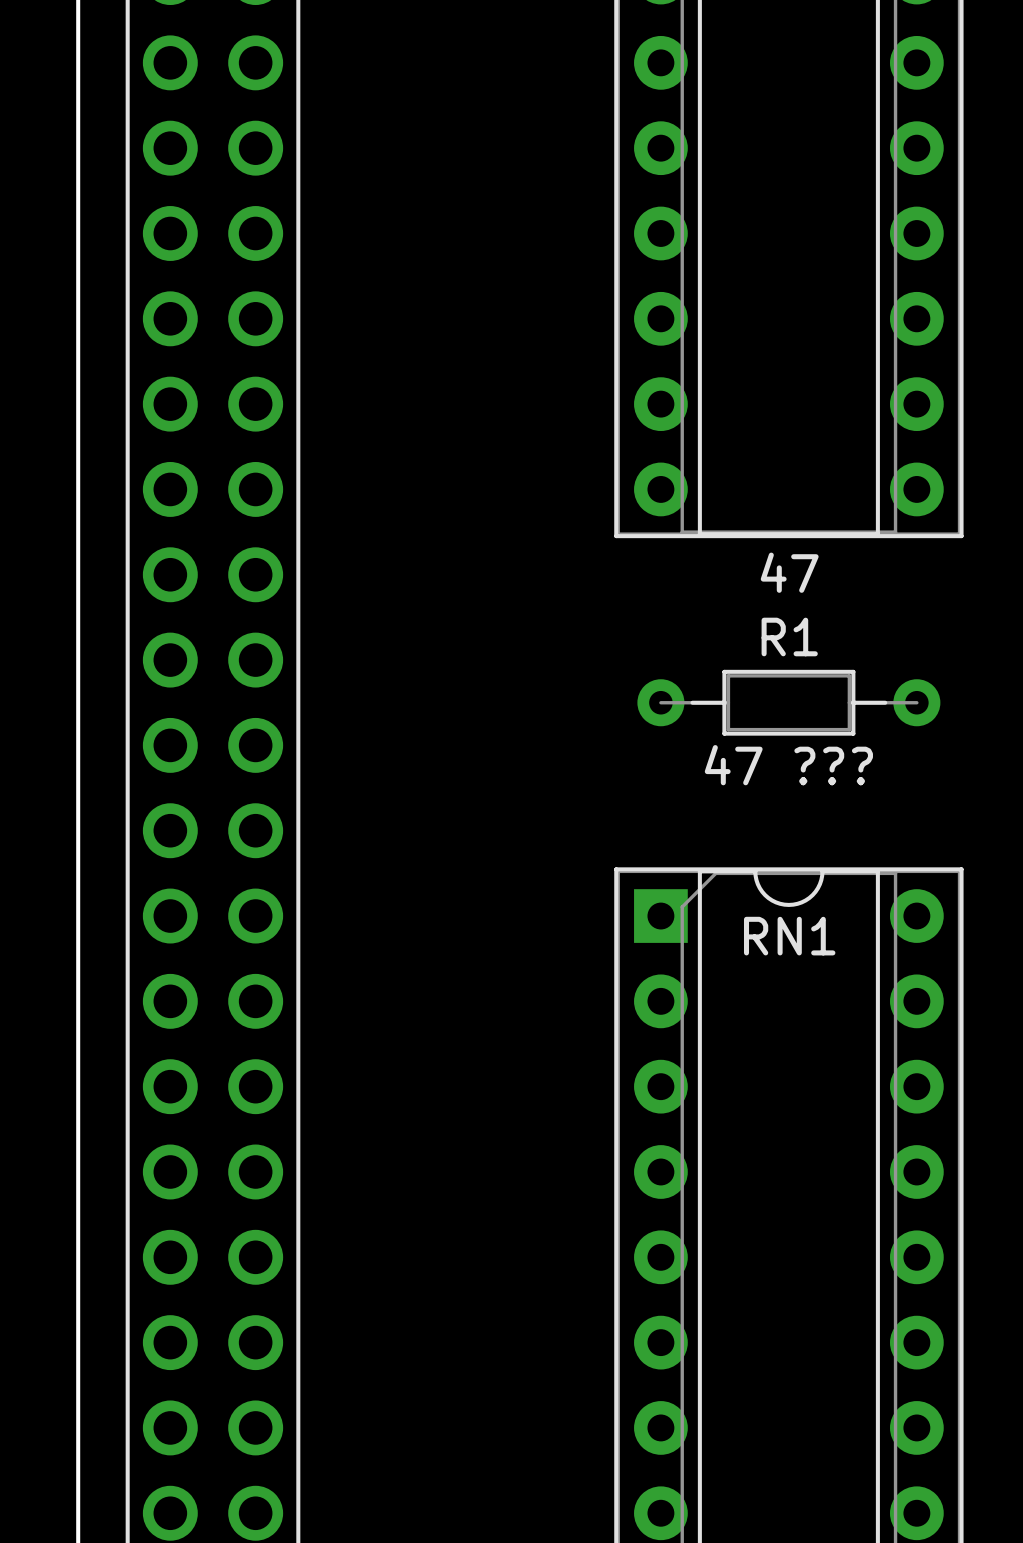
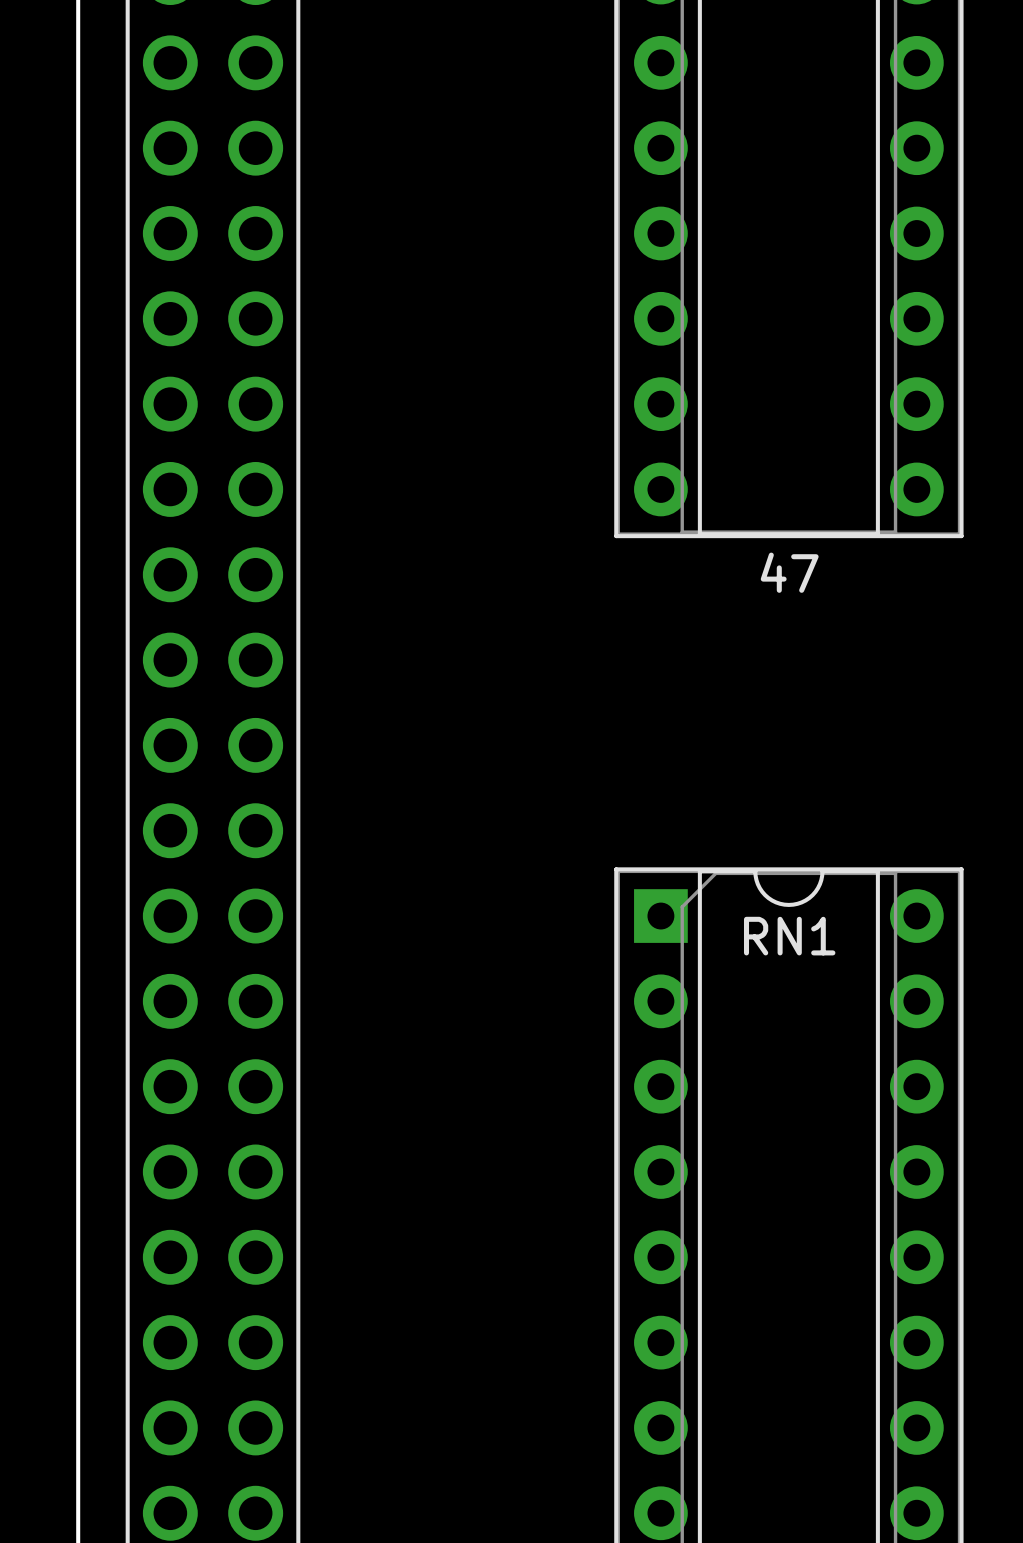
R1: 47 ??? (788, 702) -> none

